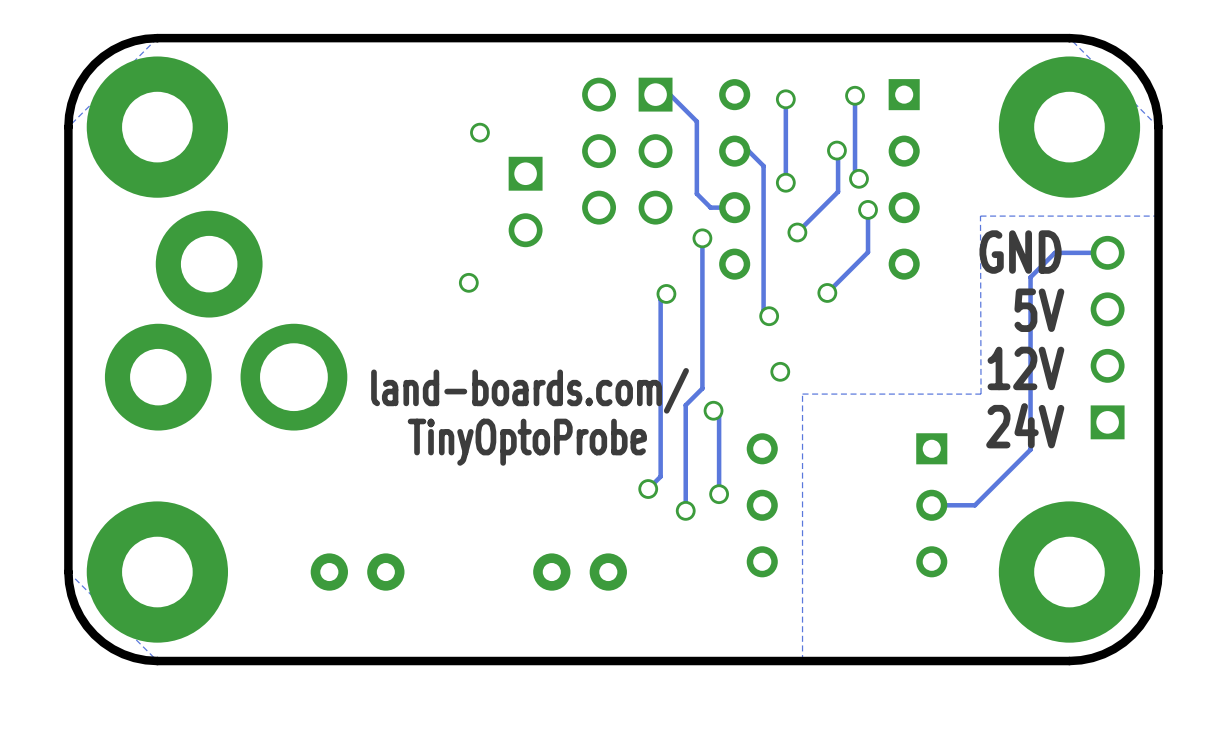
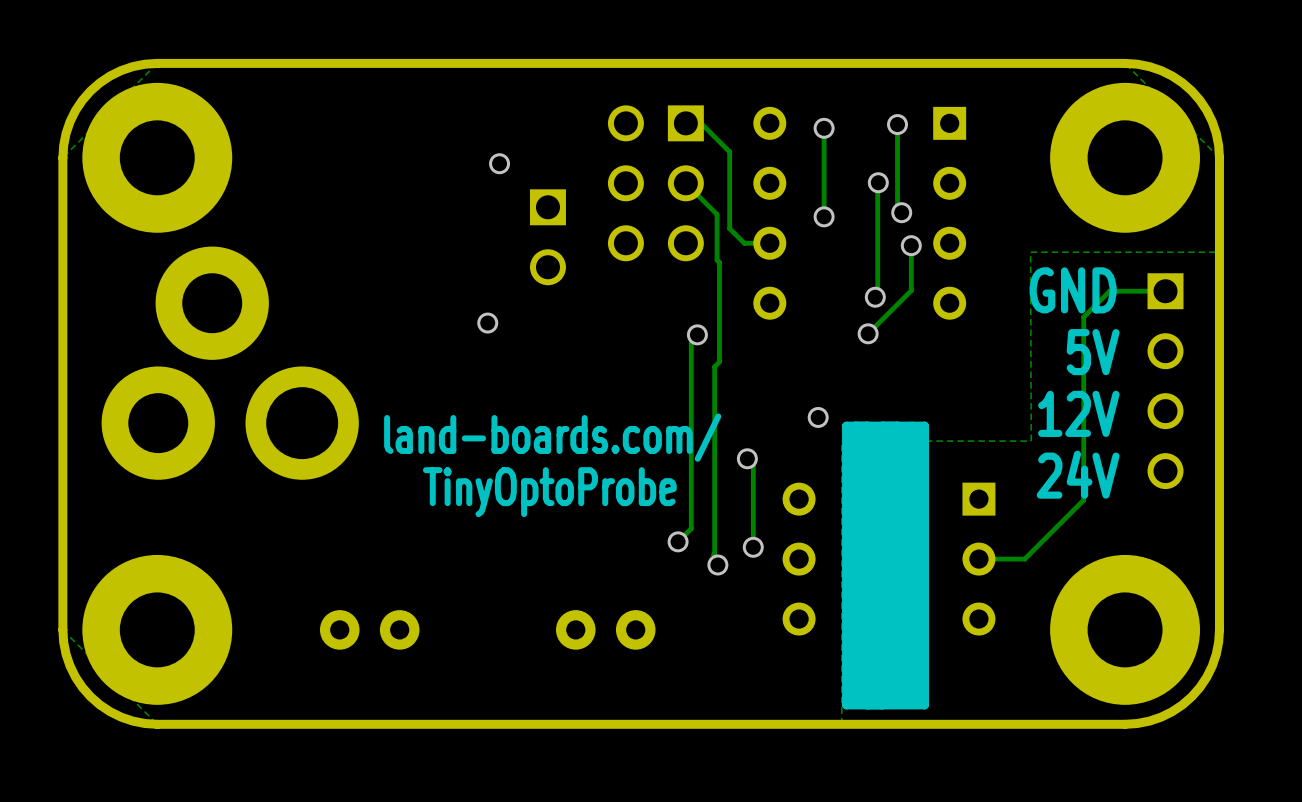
track: (836, 150) (838, 191) (797, 232) -> (877, 183) (877, 294) (875, 297)
track: none -> (685, 183) (717, 214) (717, 260) (719, 262) (719, 361) (714, 366) (713, 555)
track: (734, 151) (748, 151) (763, 166) (763, 310) (769, 316) -> none
via: (797, 232) -> none
track: (702, 238) (702, 388) (685, 405) (685, 510) -> none
via: (702, 238) -> none
via: none -> (875, 297)
via: (769, 316) -> none
part rotation: 0° (1107, 337) -> 180° (1165, 381)
drawing: none -> [842, 421, 929, 710]

